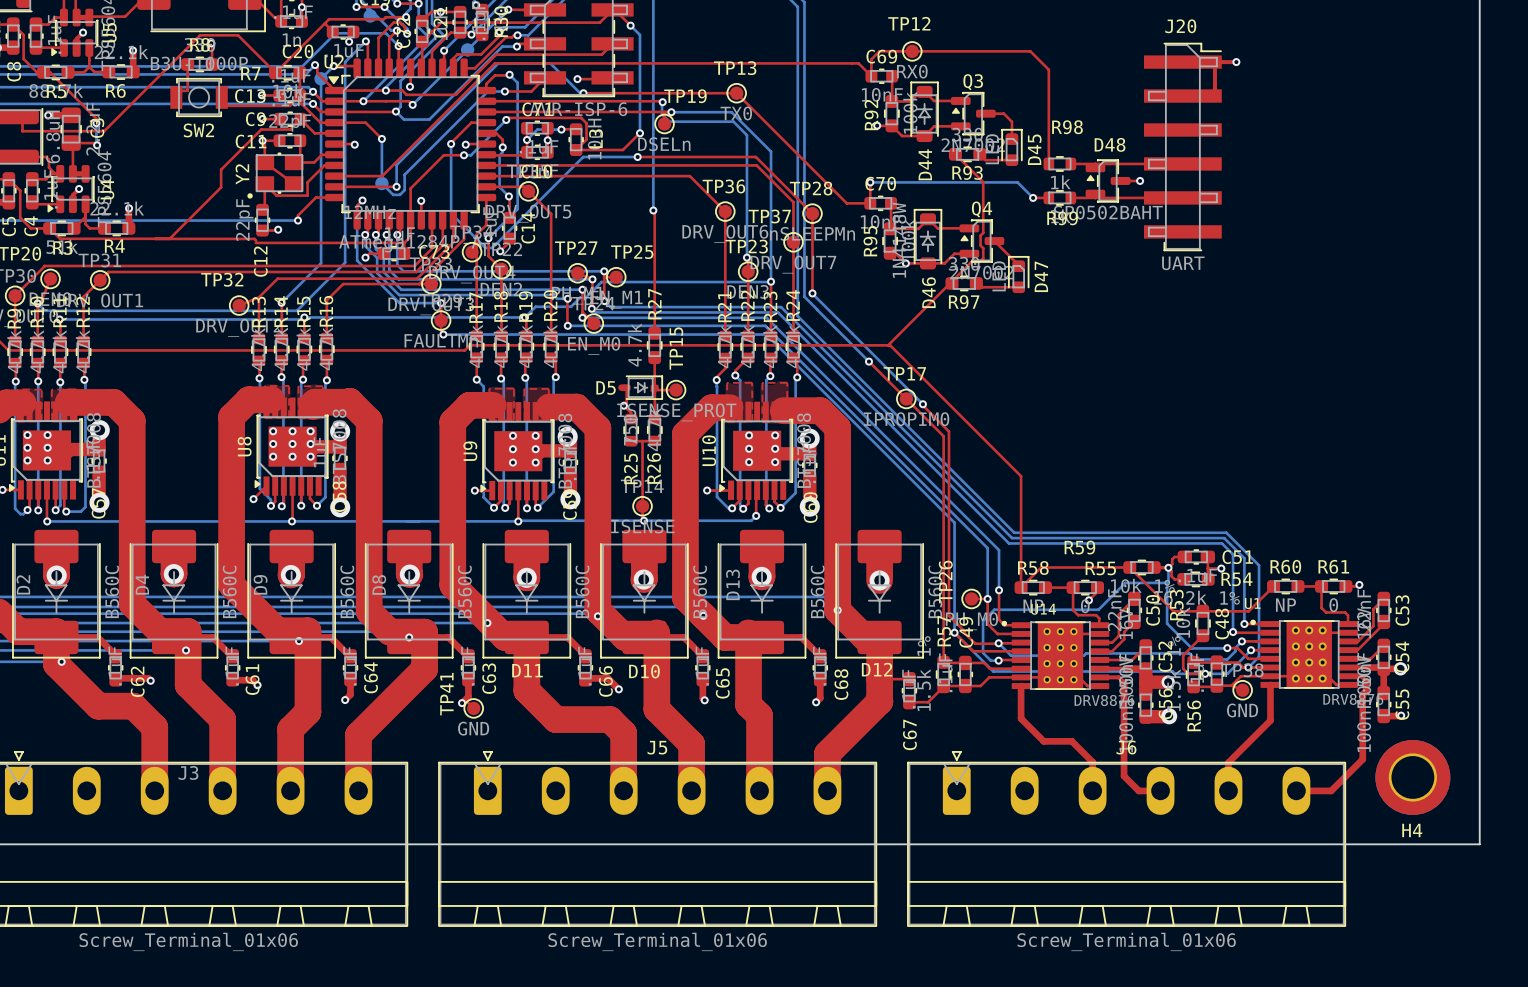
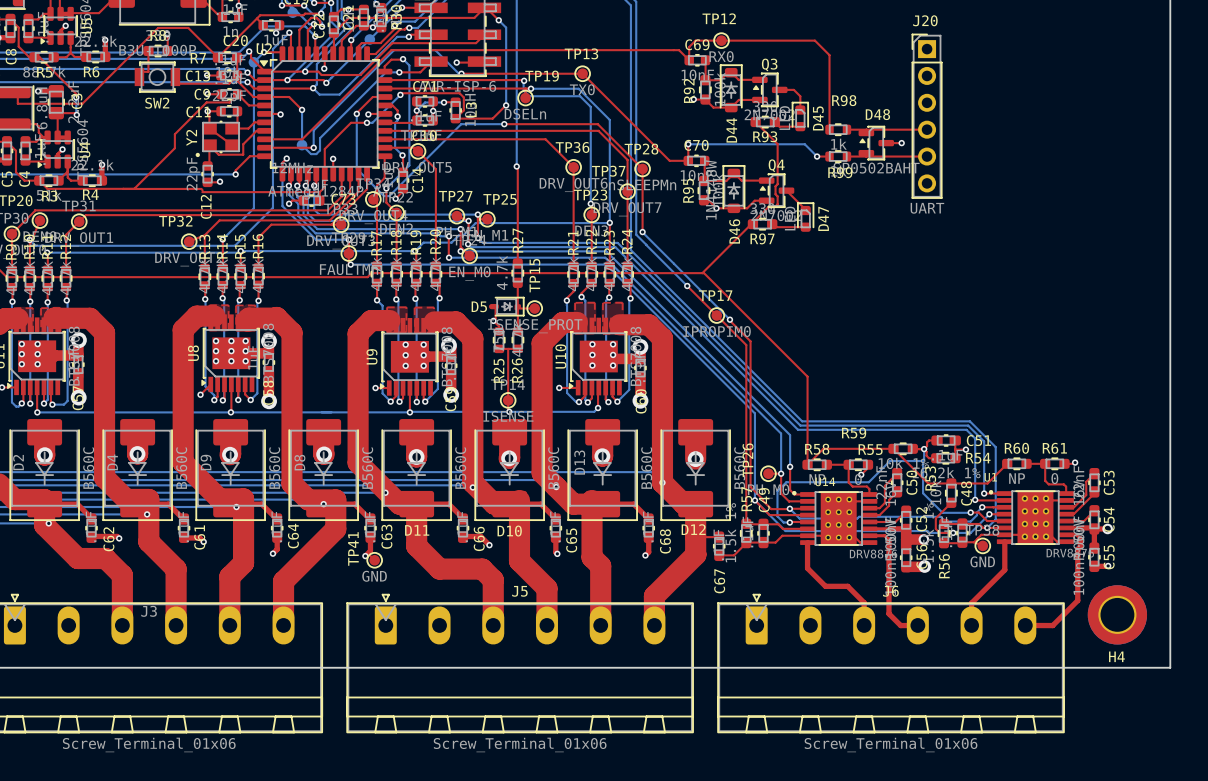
J20 footprint: [1143, 42, 1222, 252] -> [911, 33, 943, 199]
top track: (1236, 62) (1214, 62) (1214, 96) -> none
via: (1236, 62) -> none

